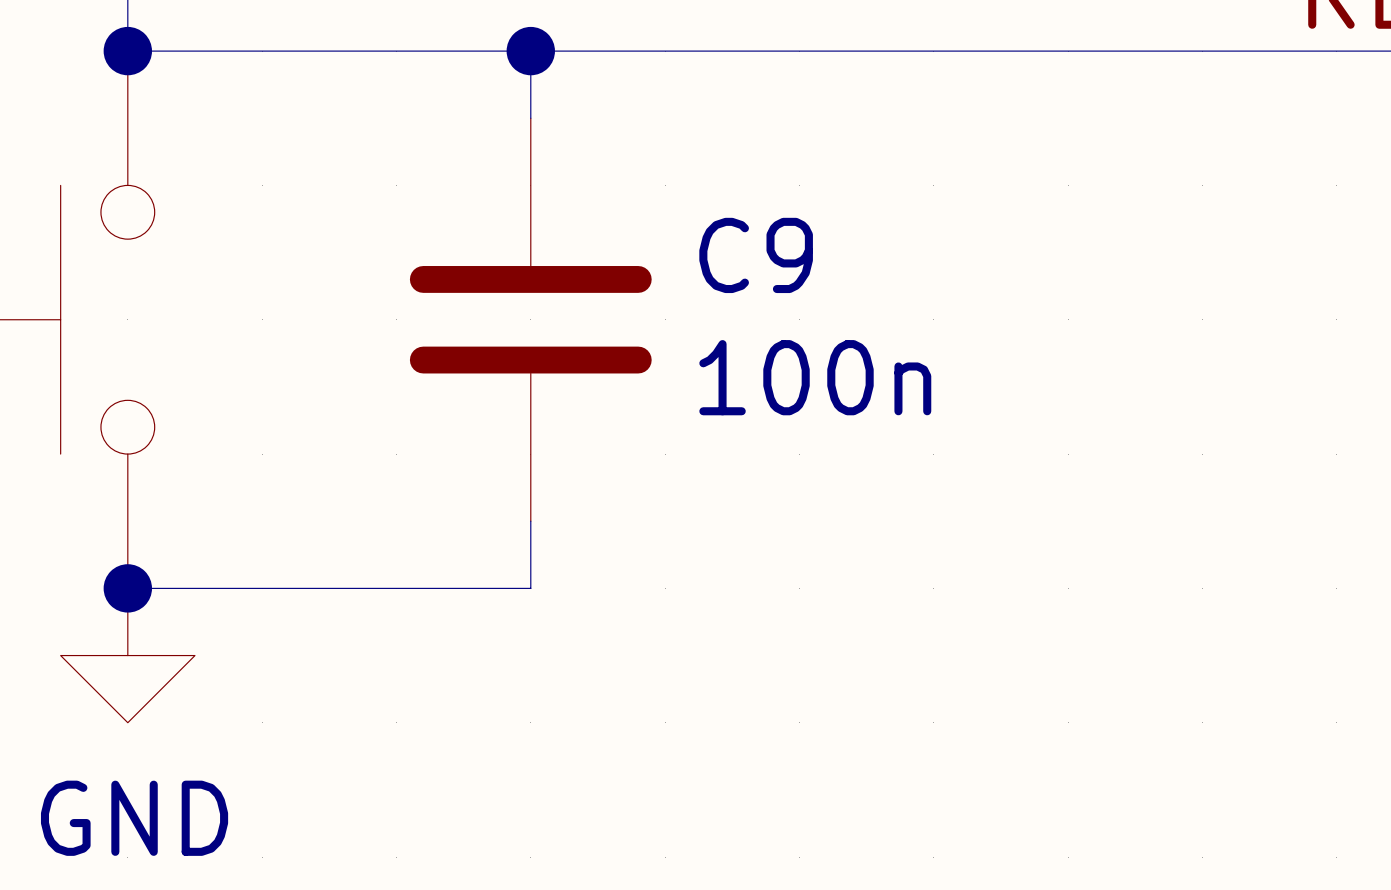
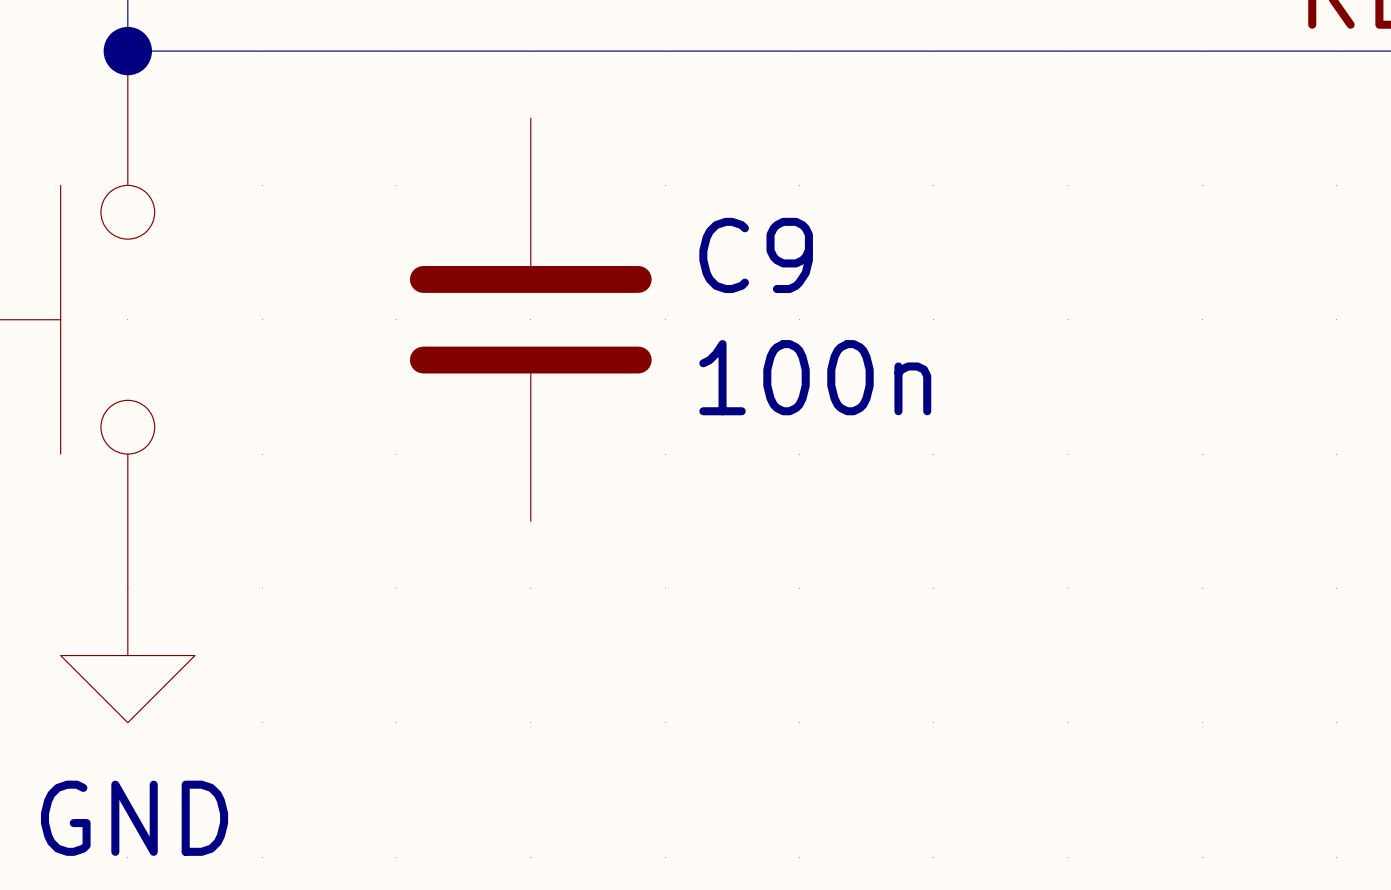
wire: (530, 51) (530, 118) -> none
junction: (530, 51) -> none
wire: (530, 521) (530, 588) (127, 588) -> none
junction: (127, 588) -> none

